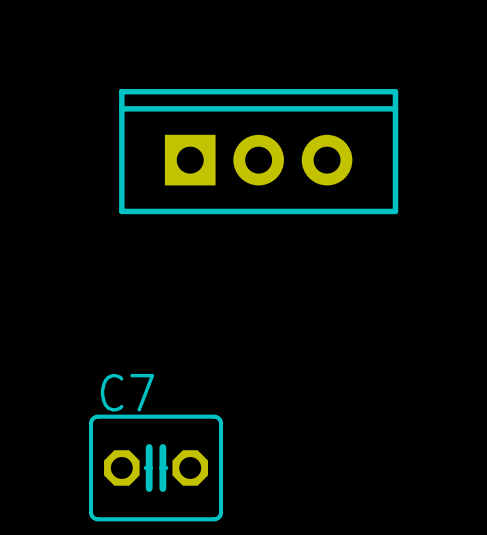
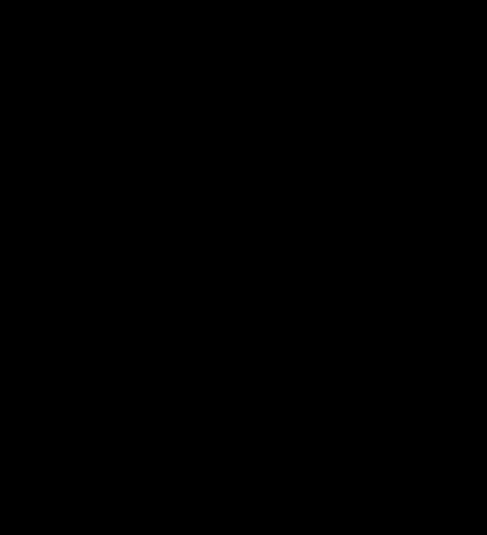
part: (258, 151) -> none
C7: (156, 467) -> none

